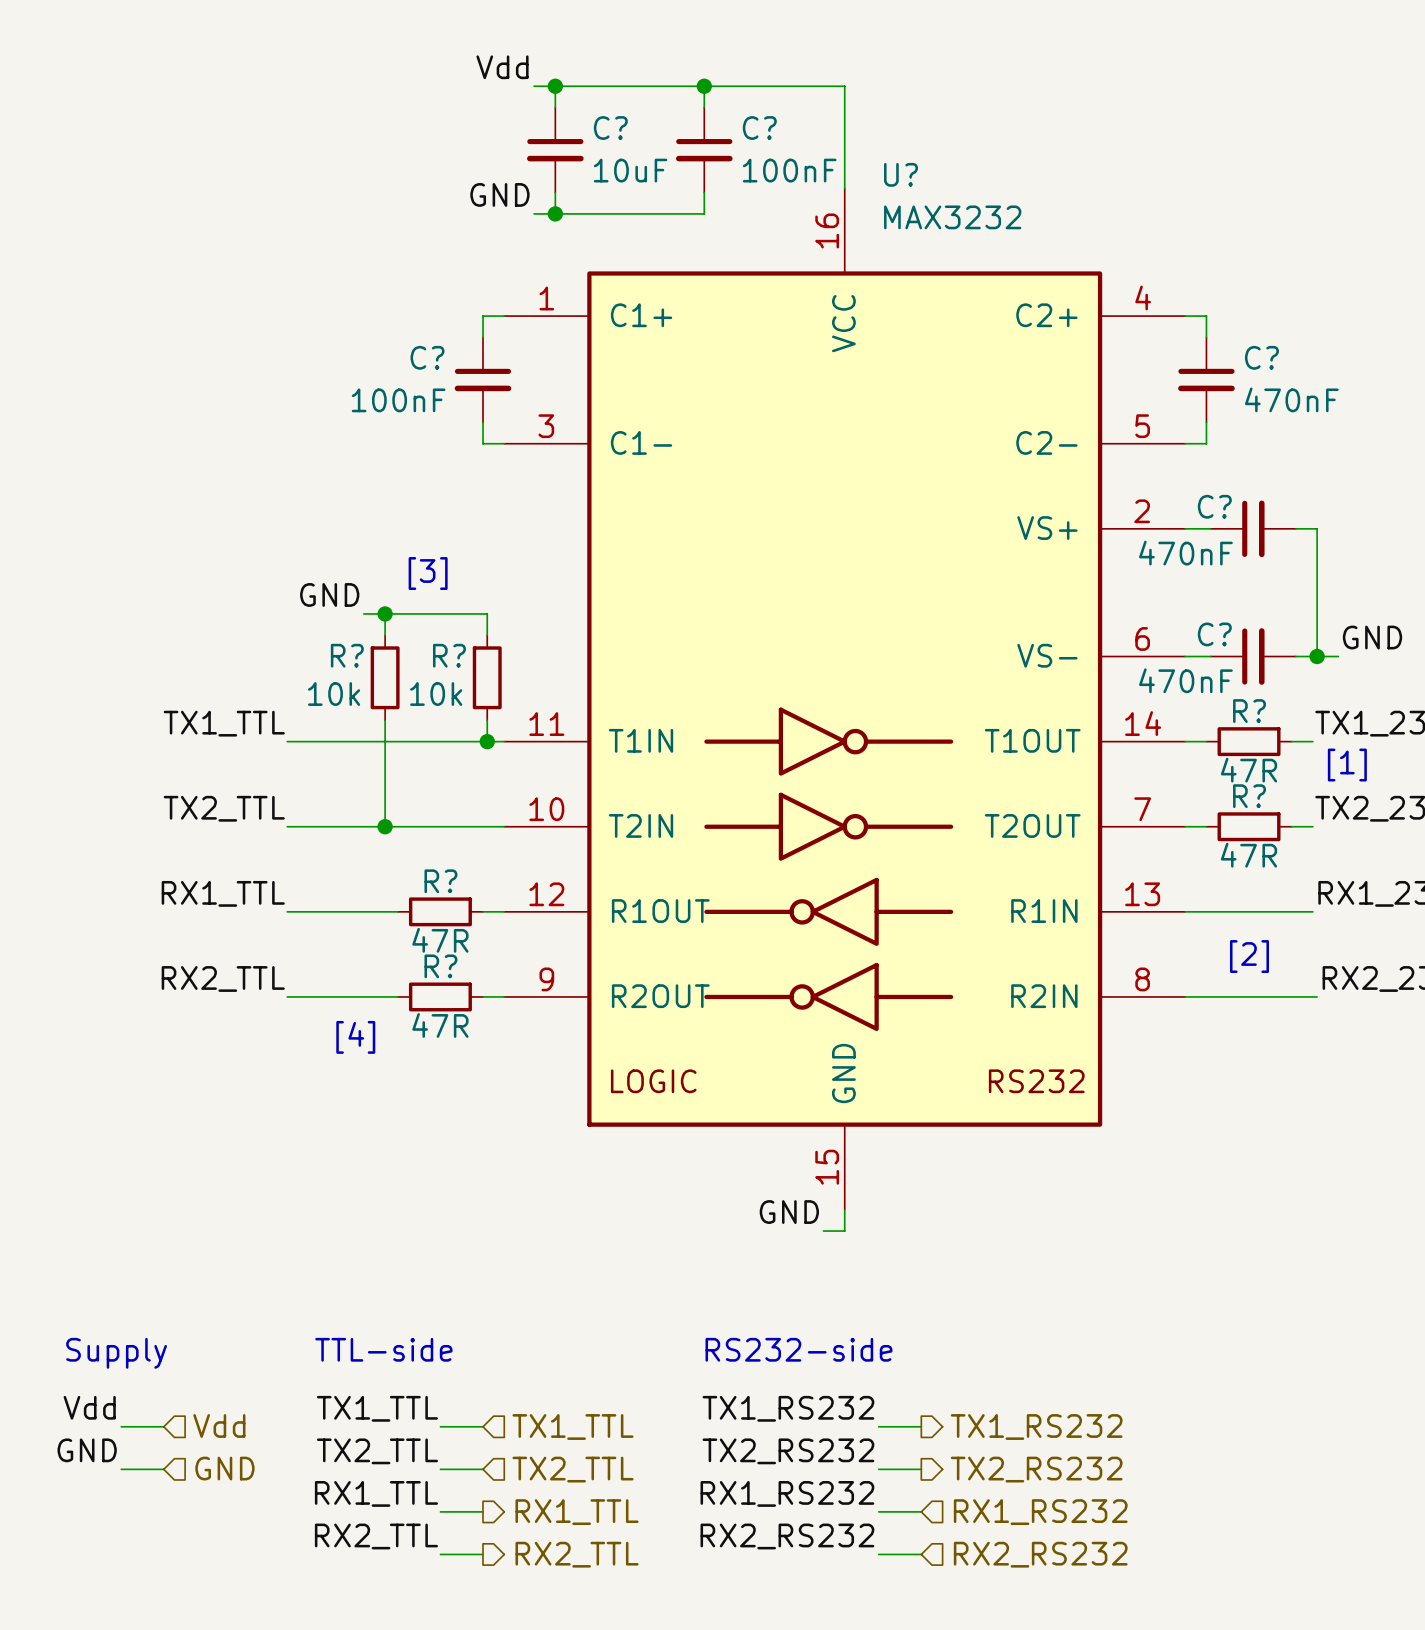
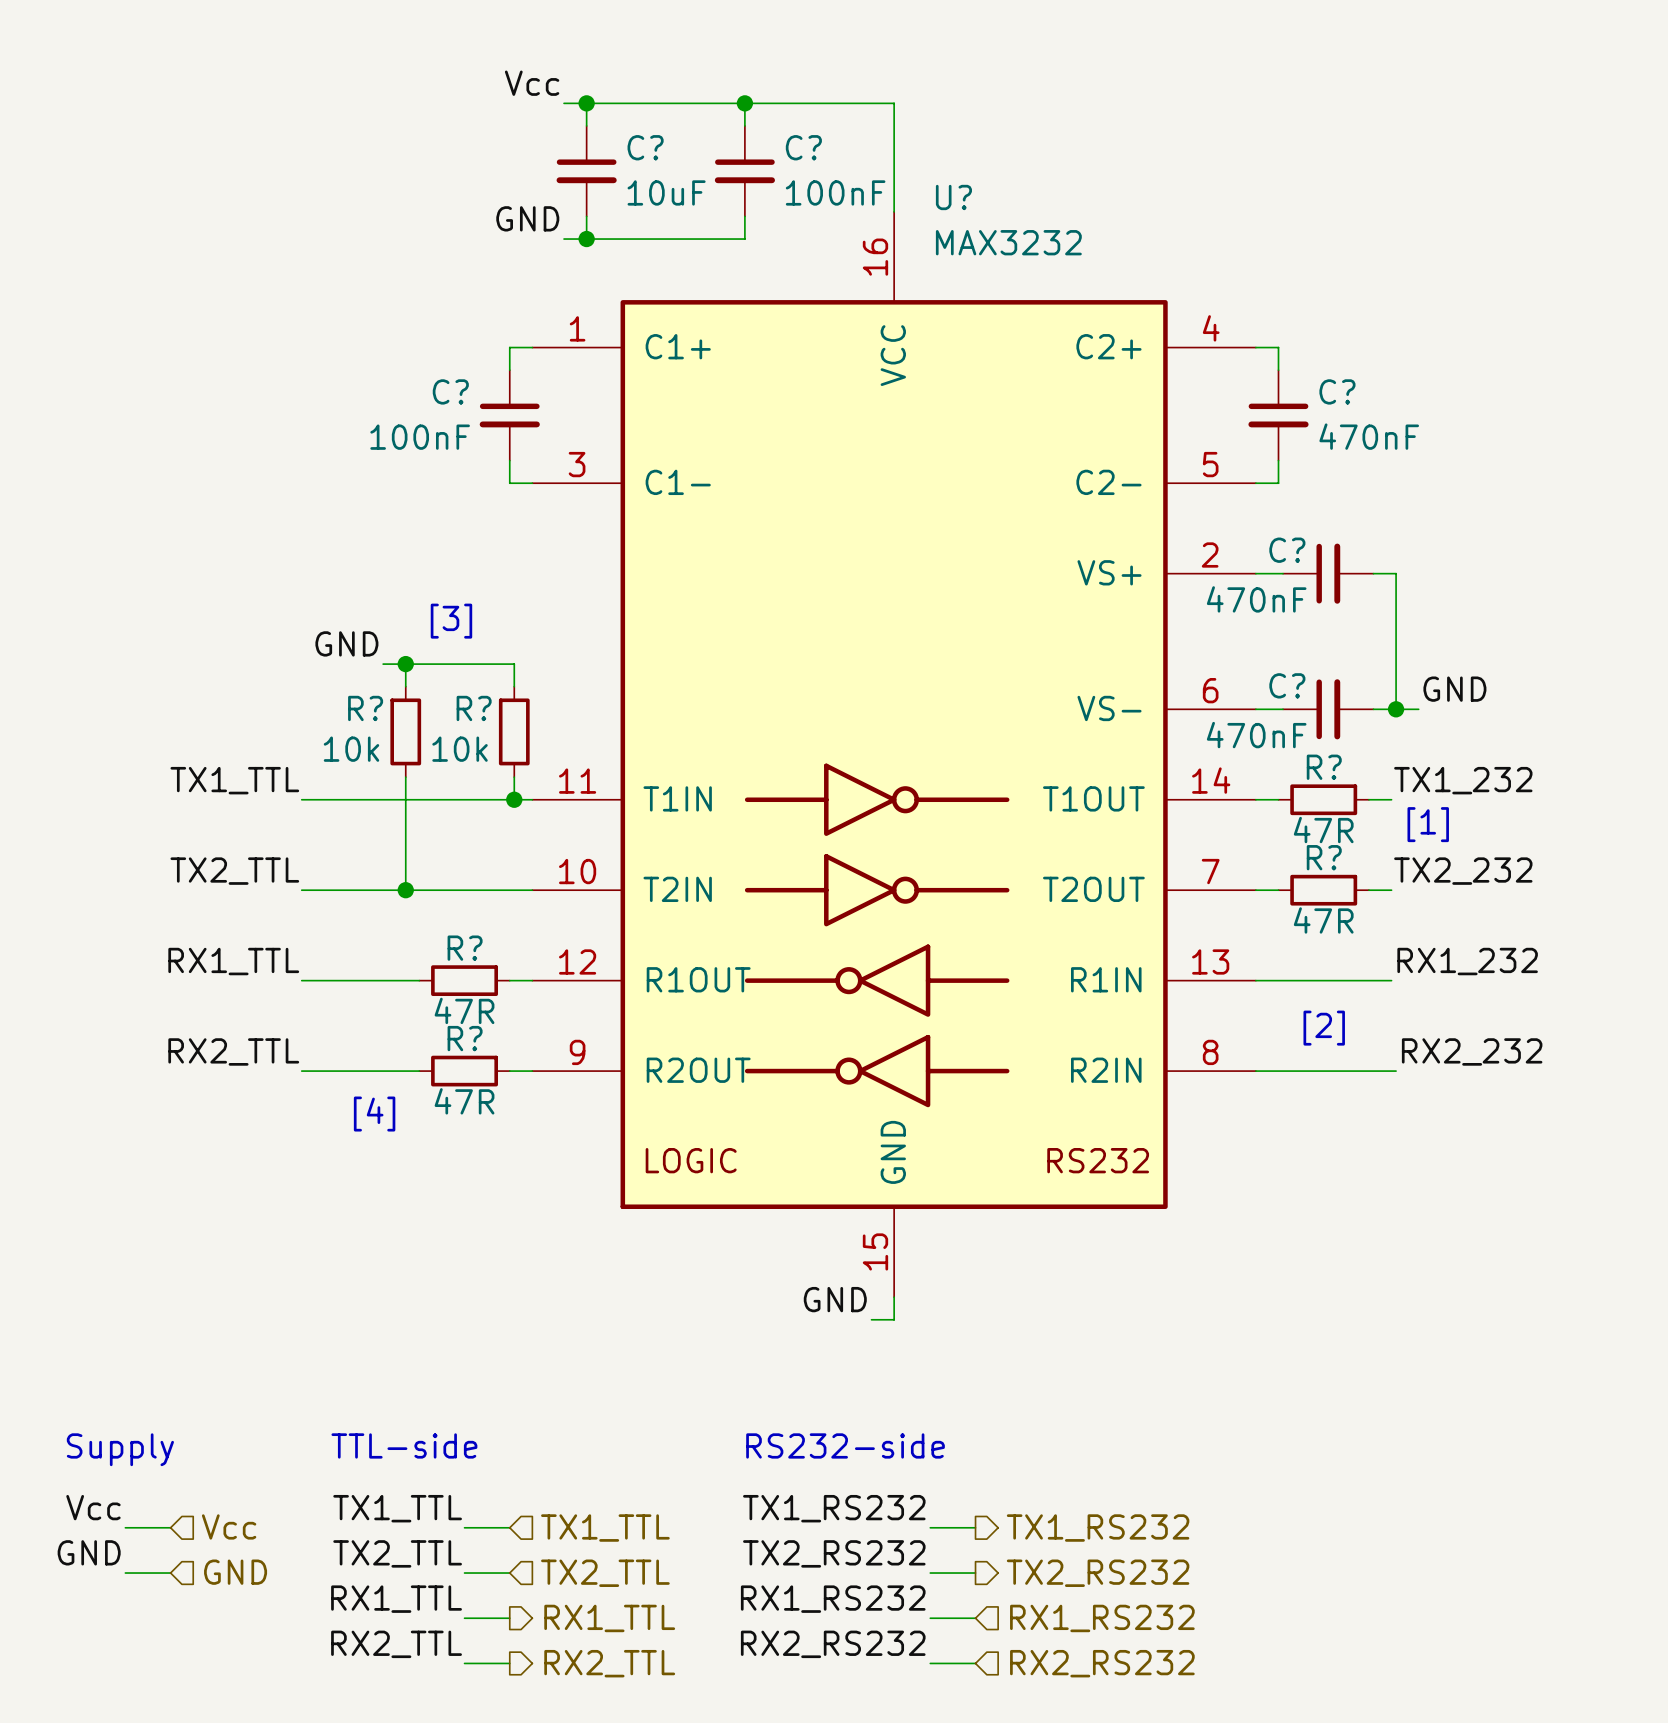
label: Vdd (502, 67) -> Vcc (532, 83)
label: Vdd (89, 1407) -> Vcc (93, 1507)
hierarchical label: Vdd (219, 1425) -> Vcc (229, 1526)

